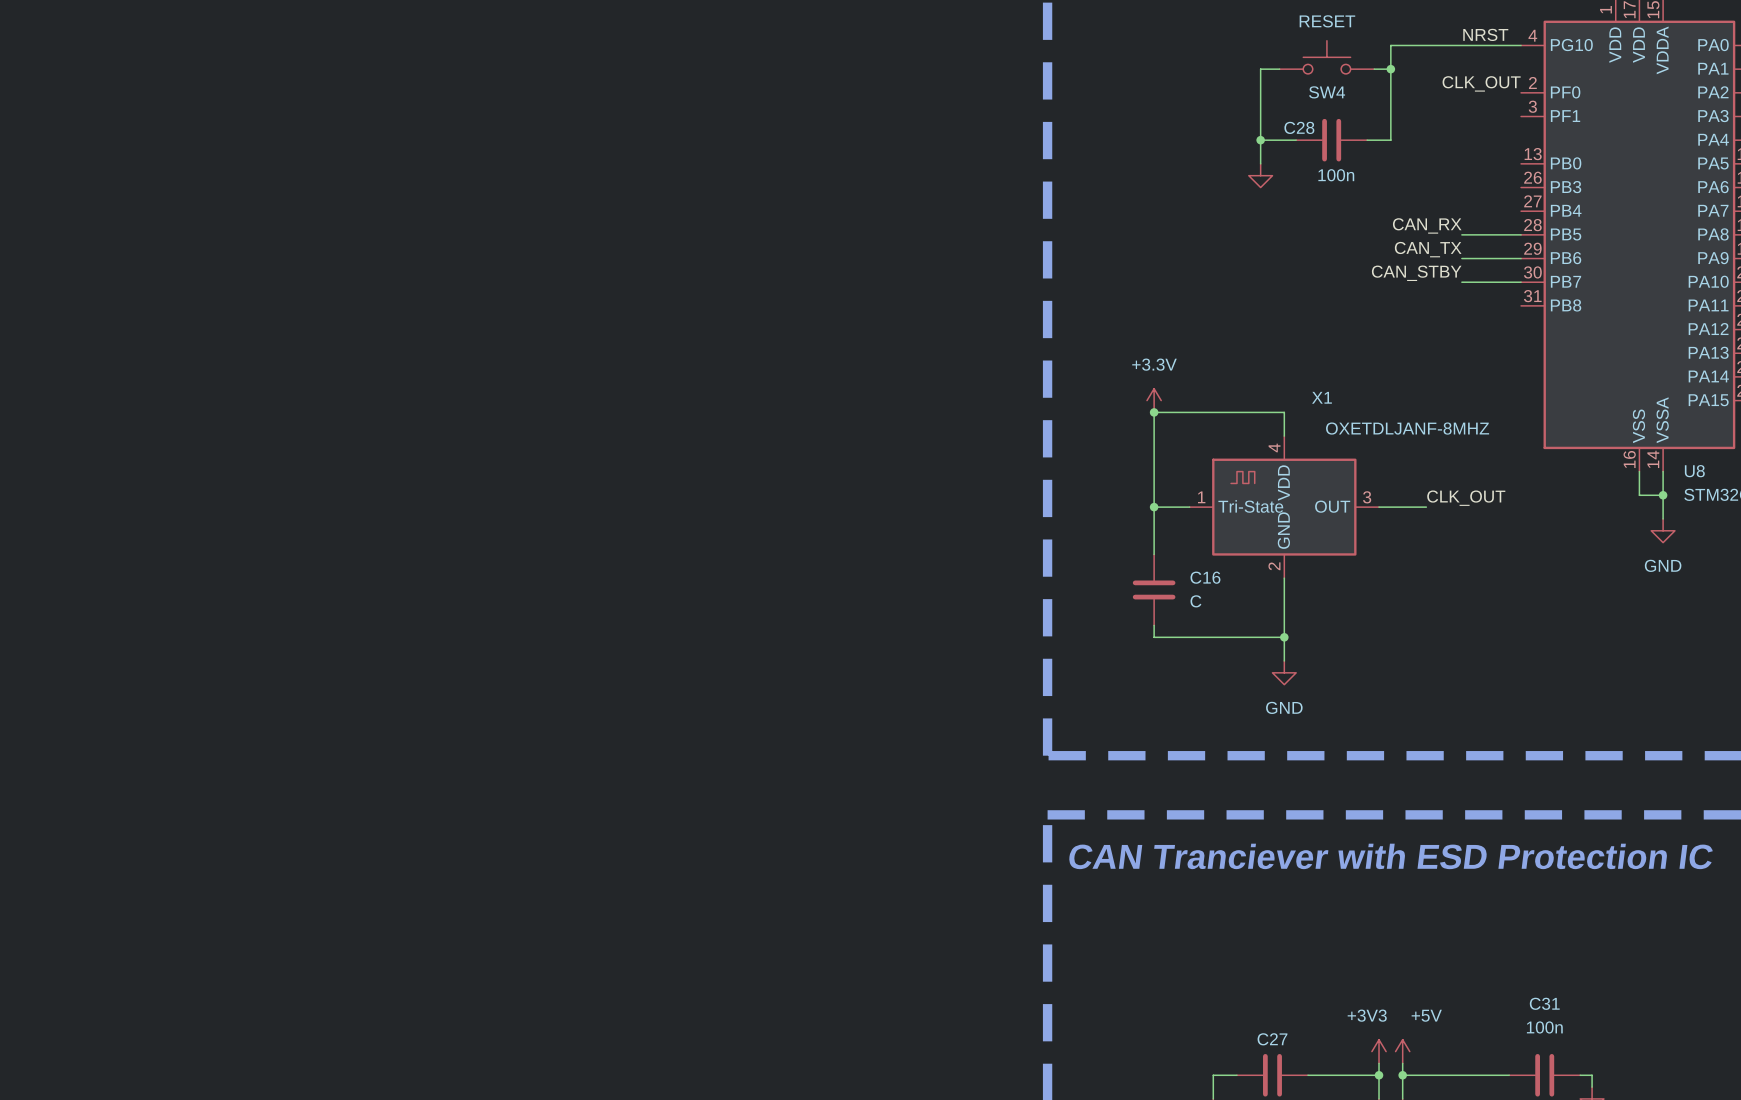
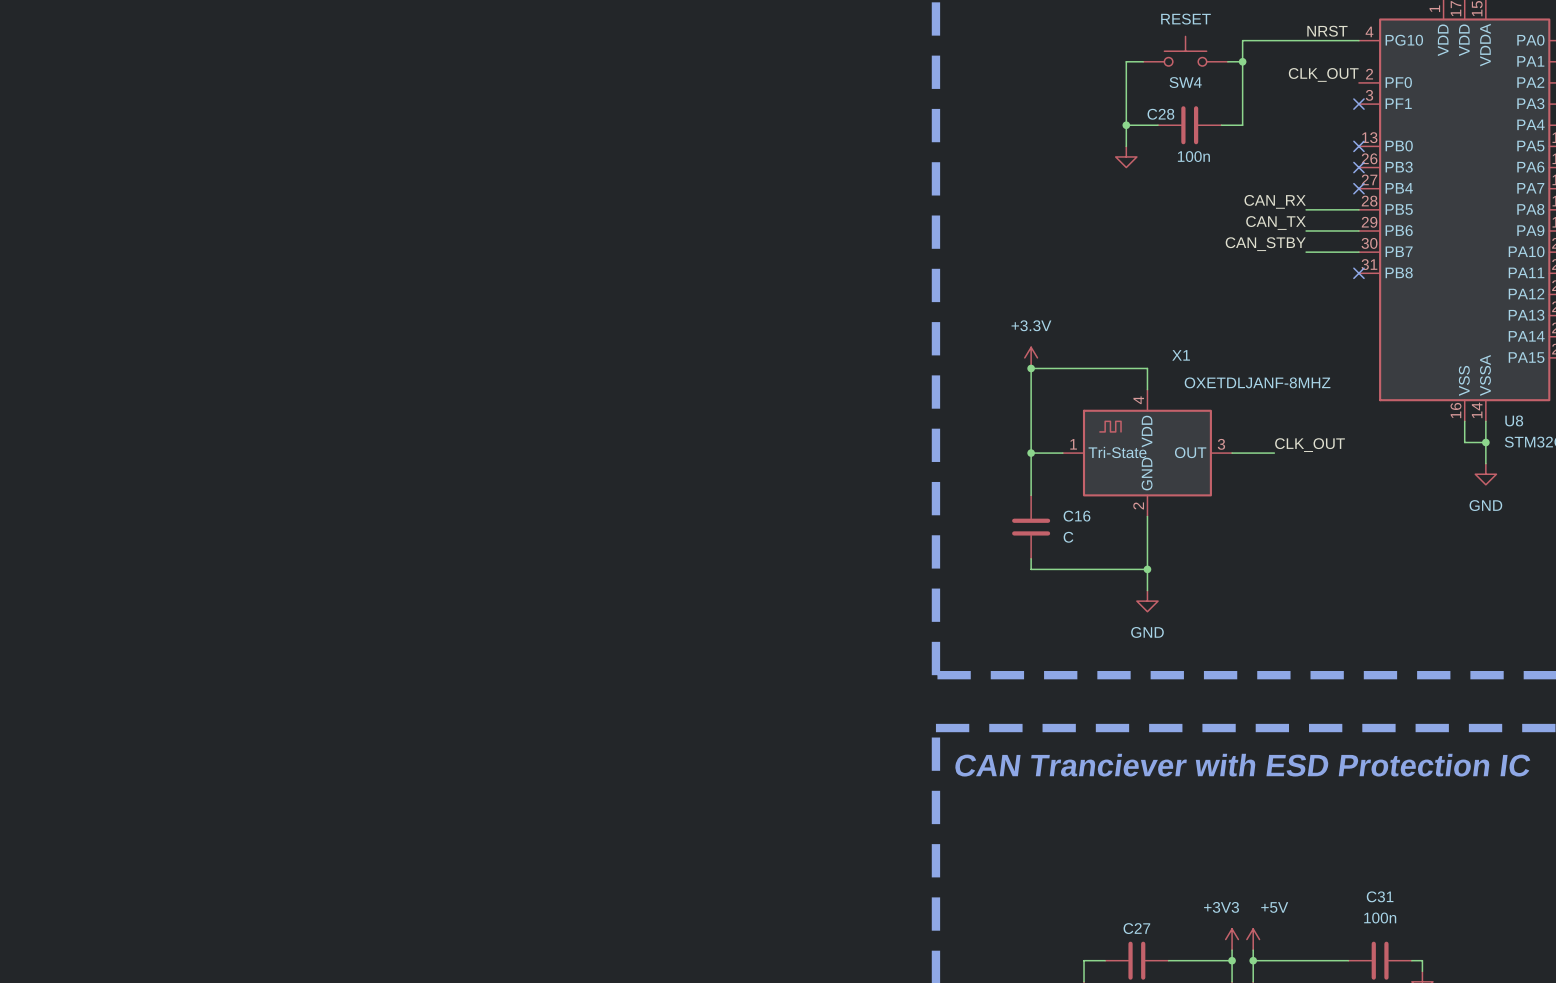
no-connect mark: none -> (1358, 104)
no-connect mark: none -> (1358, 146)
no-connect mark: none -> (1358, 167)
no-connect mark: none -> (1358, 188)
no-connect mark: none -> (1358, 273)

